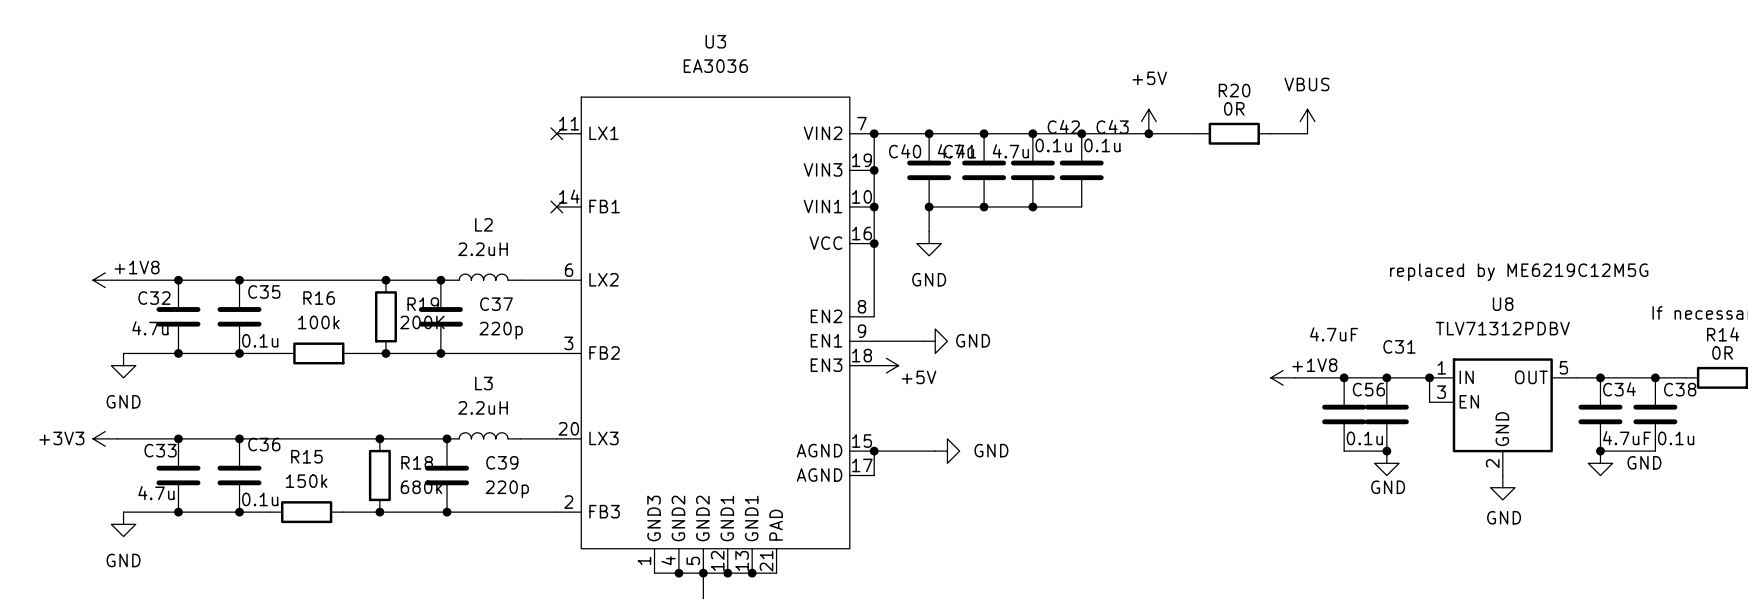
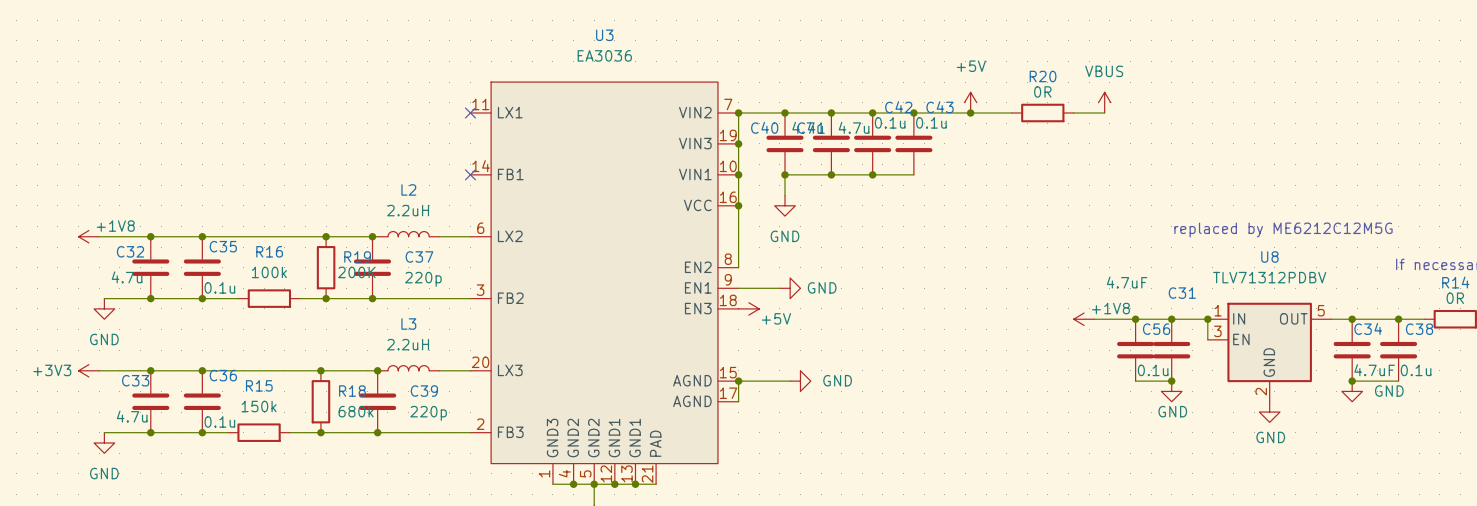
text: replaced by ME6219C12M5G (1519, 272) -> replaced by ME6212C12M5G (1283, 230)

